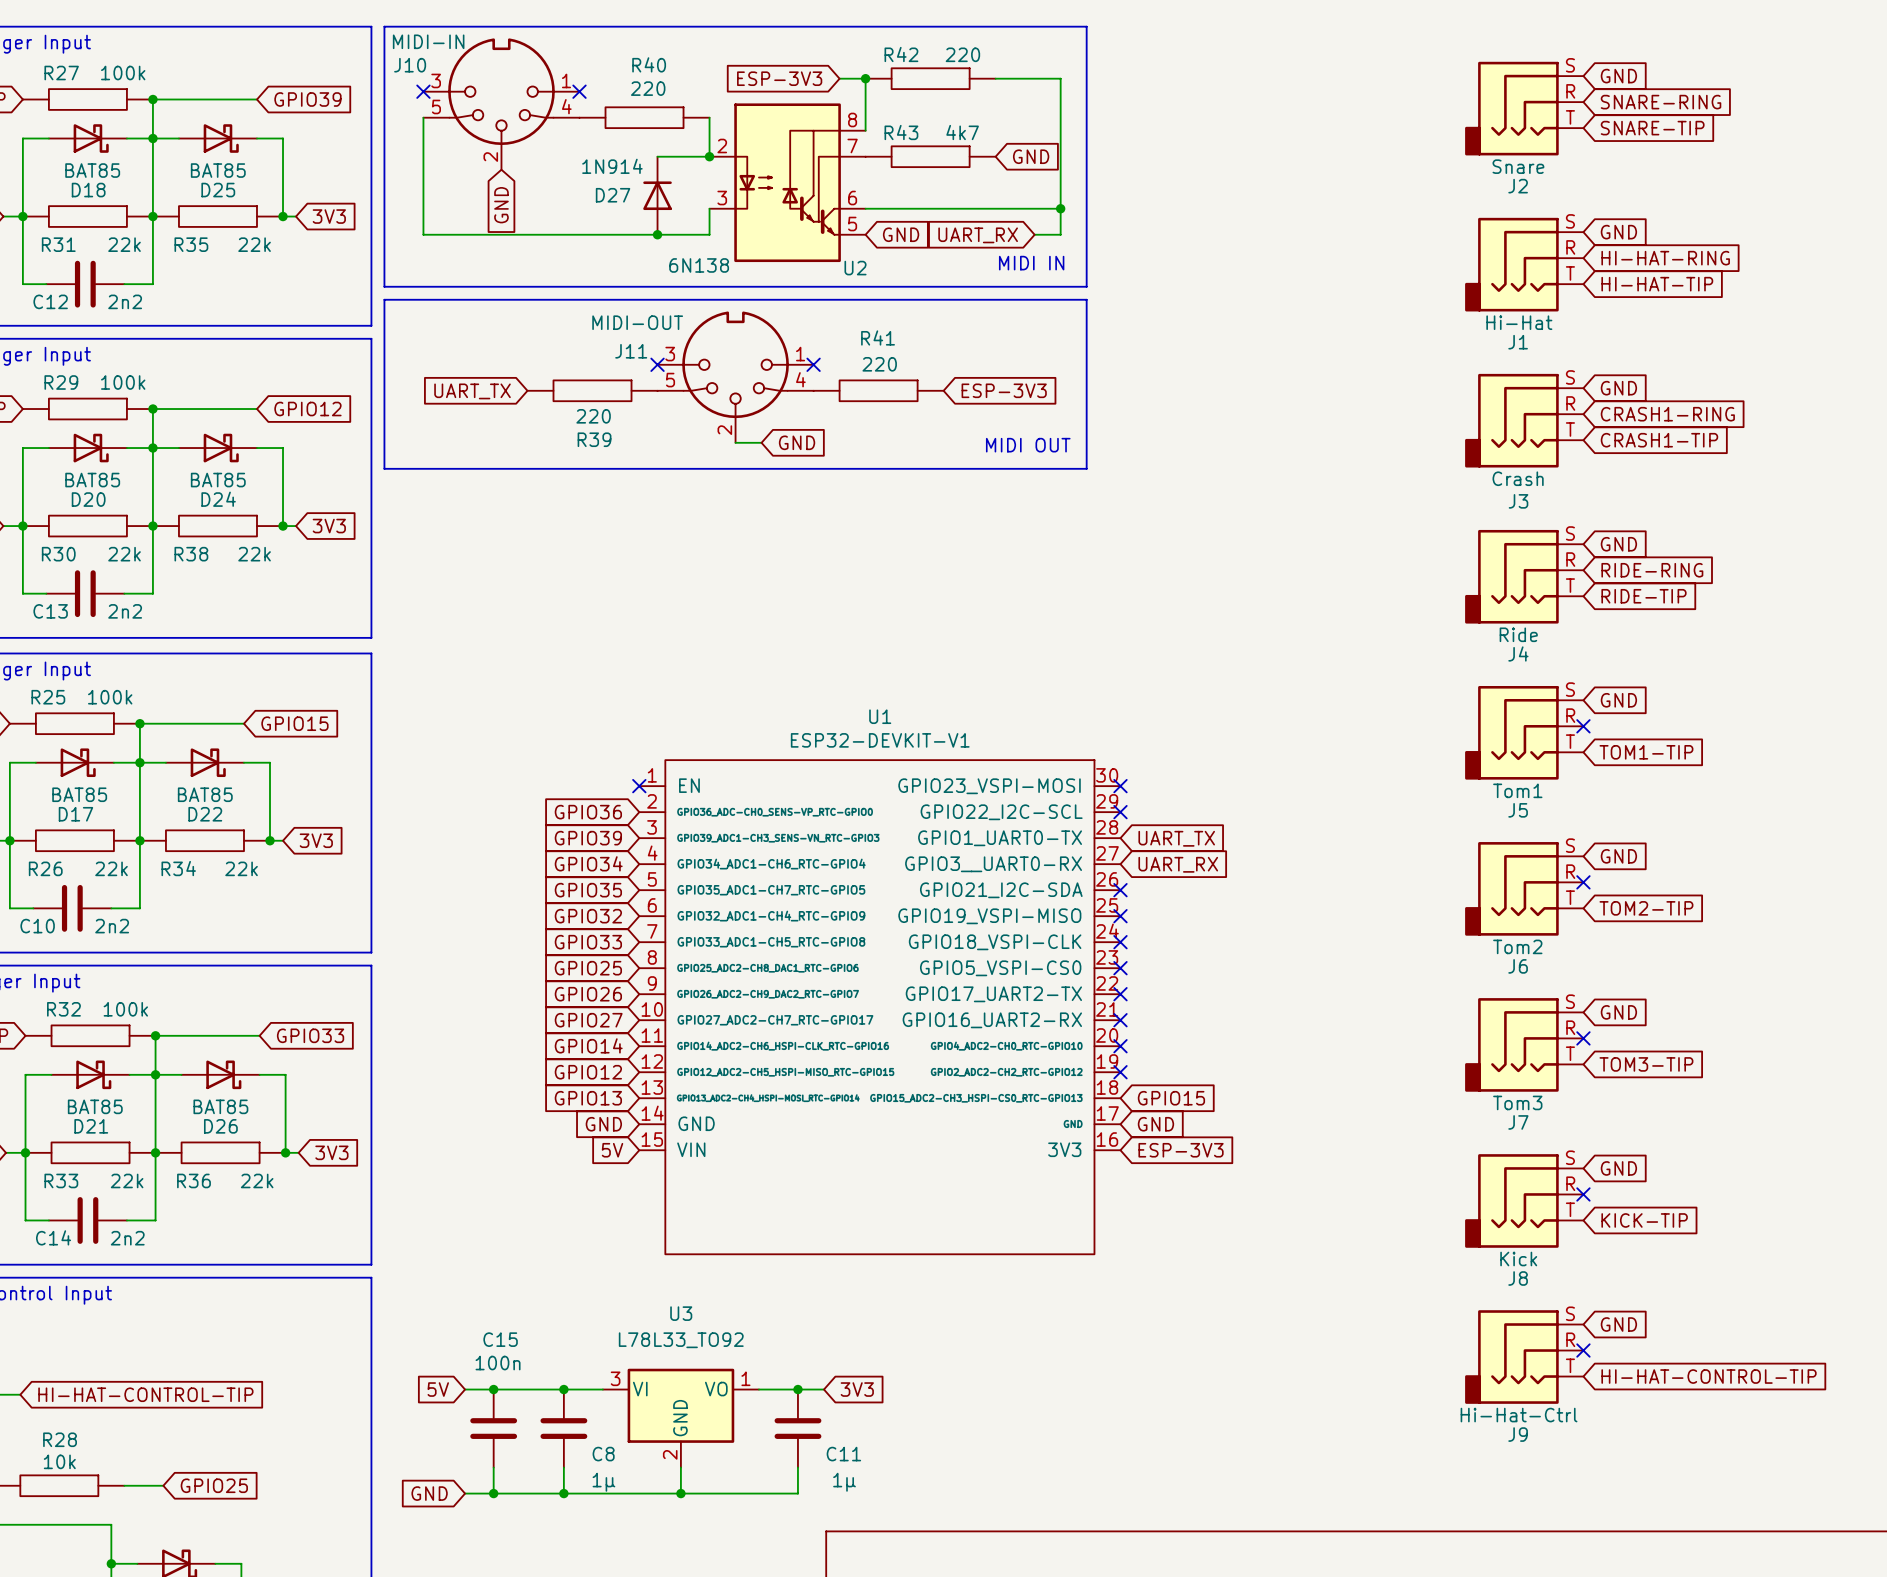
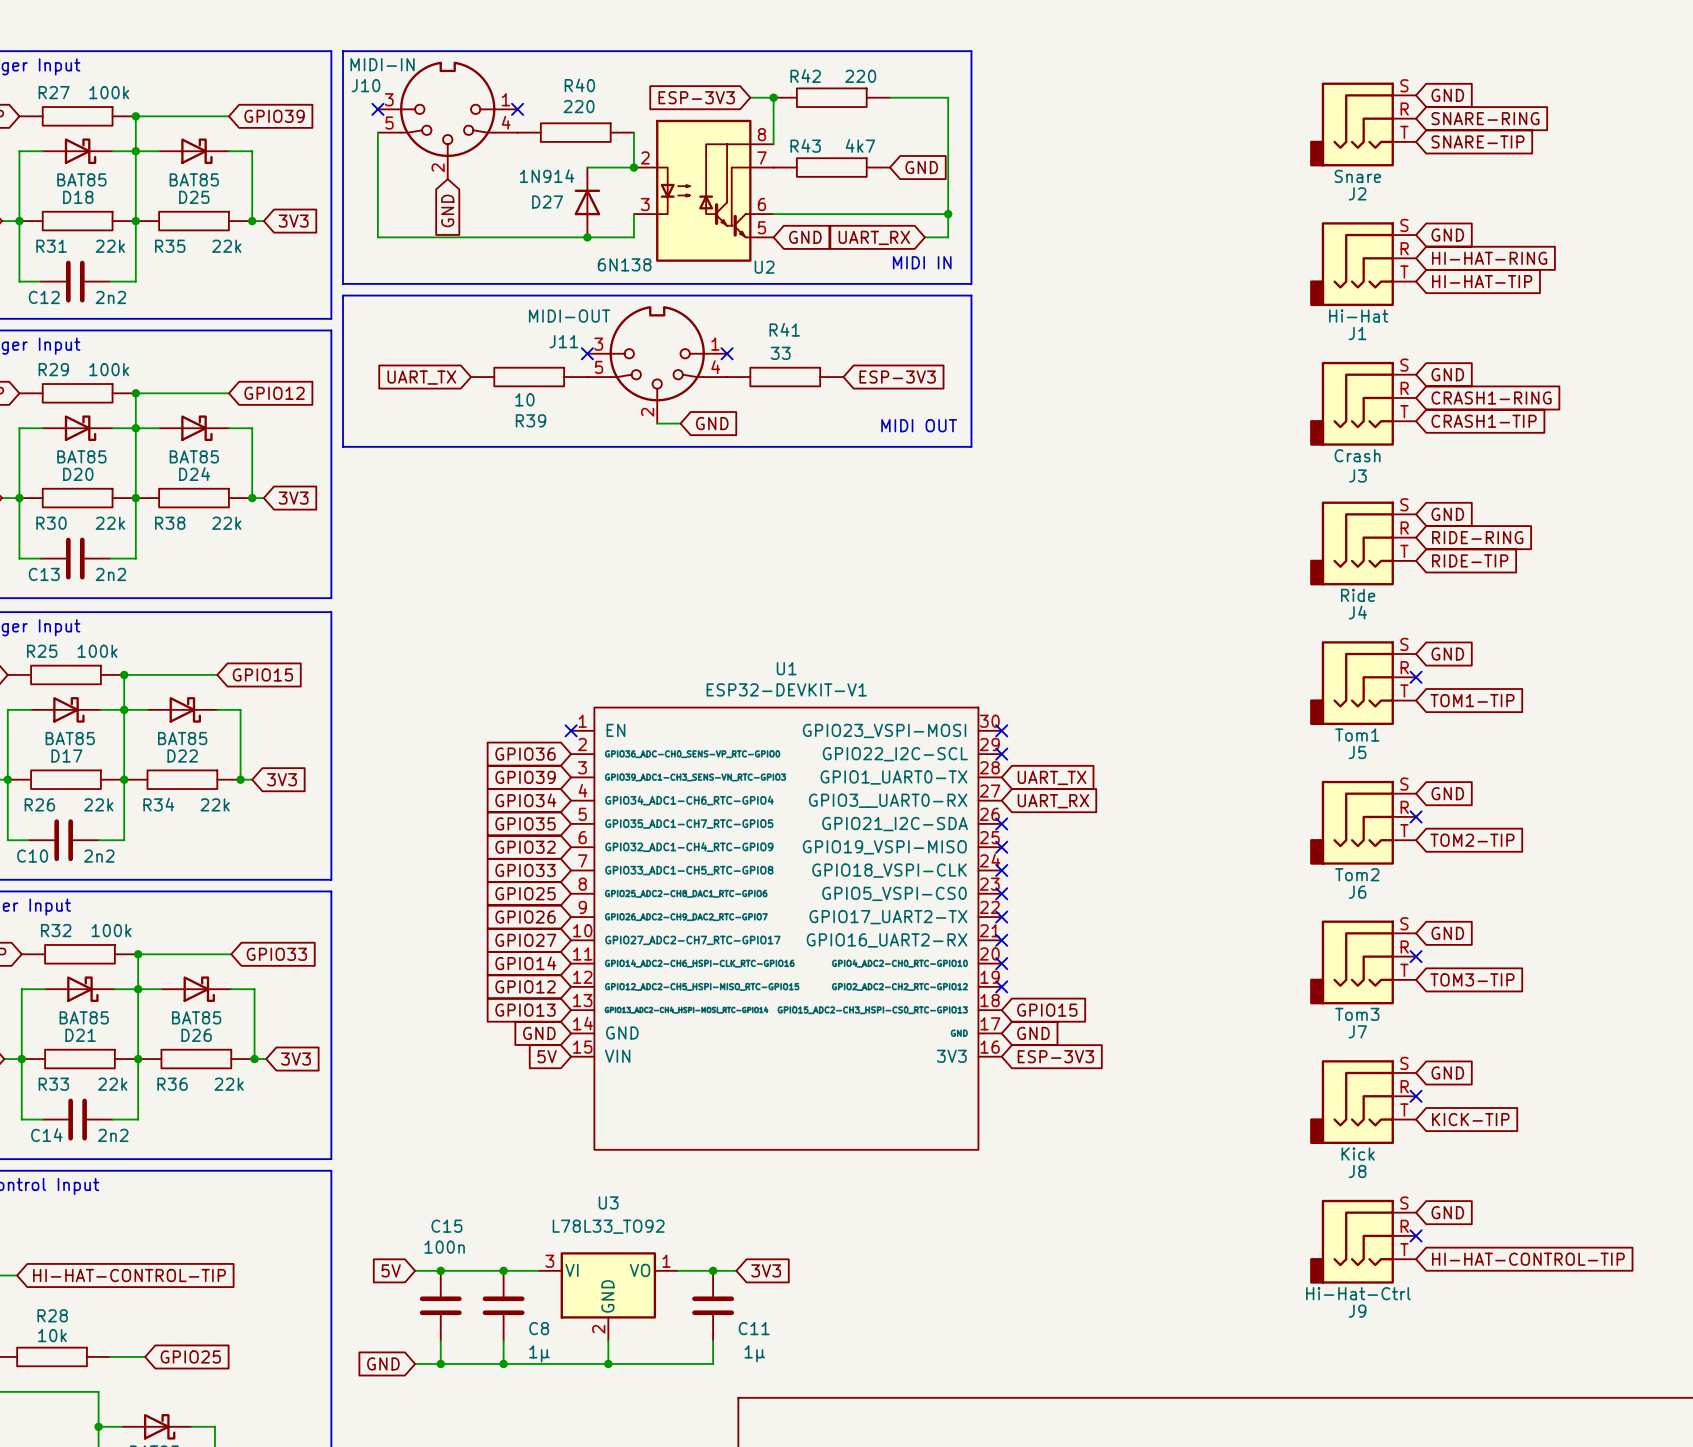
R41 value: 220 (879, 364) -> 33 (780, 353)
R39 value: 220 (593, 416) -> 10 (524, 399)

